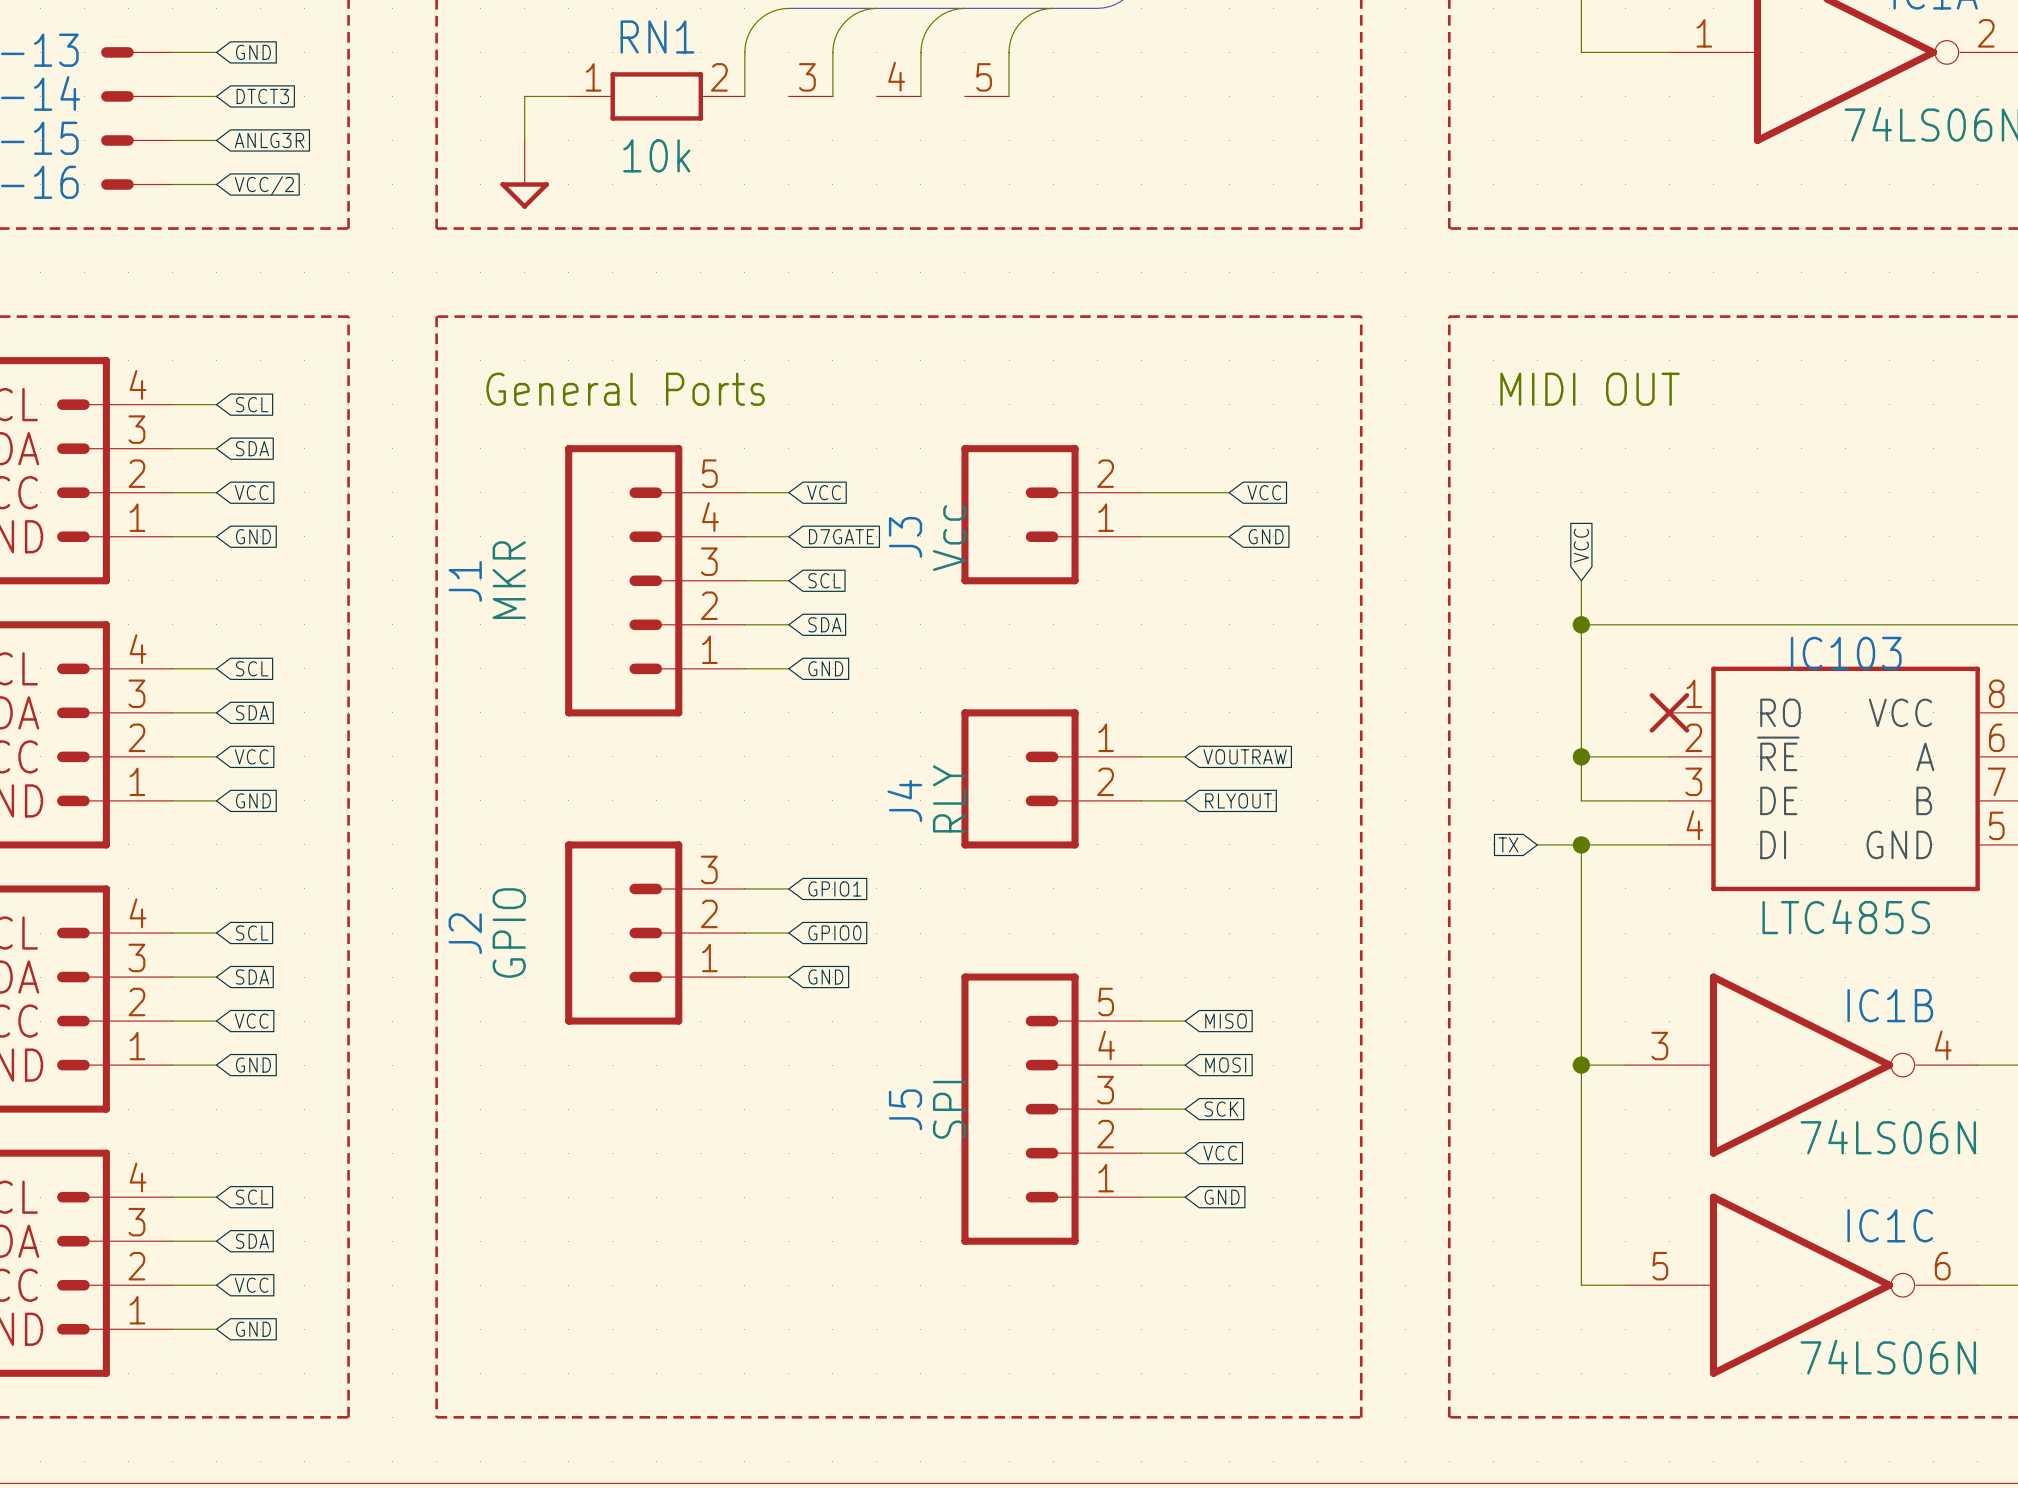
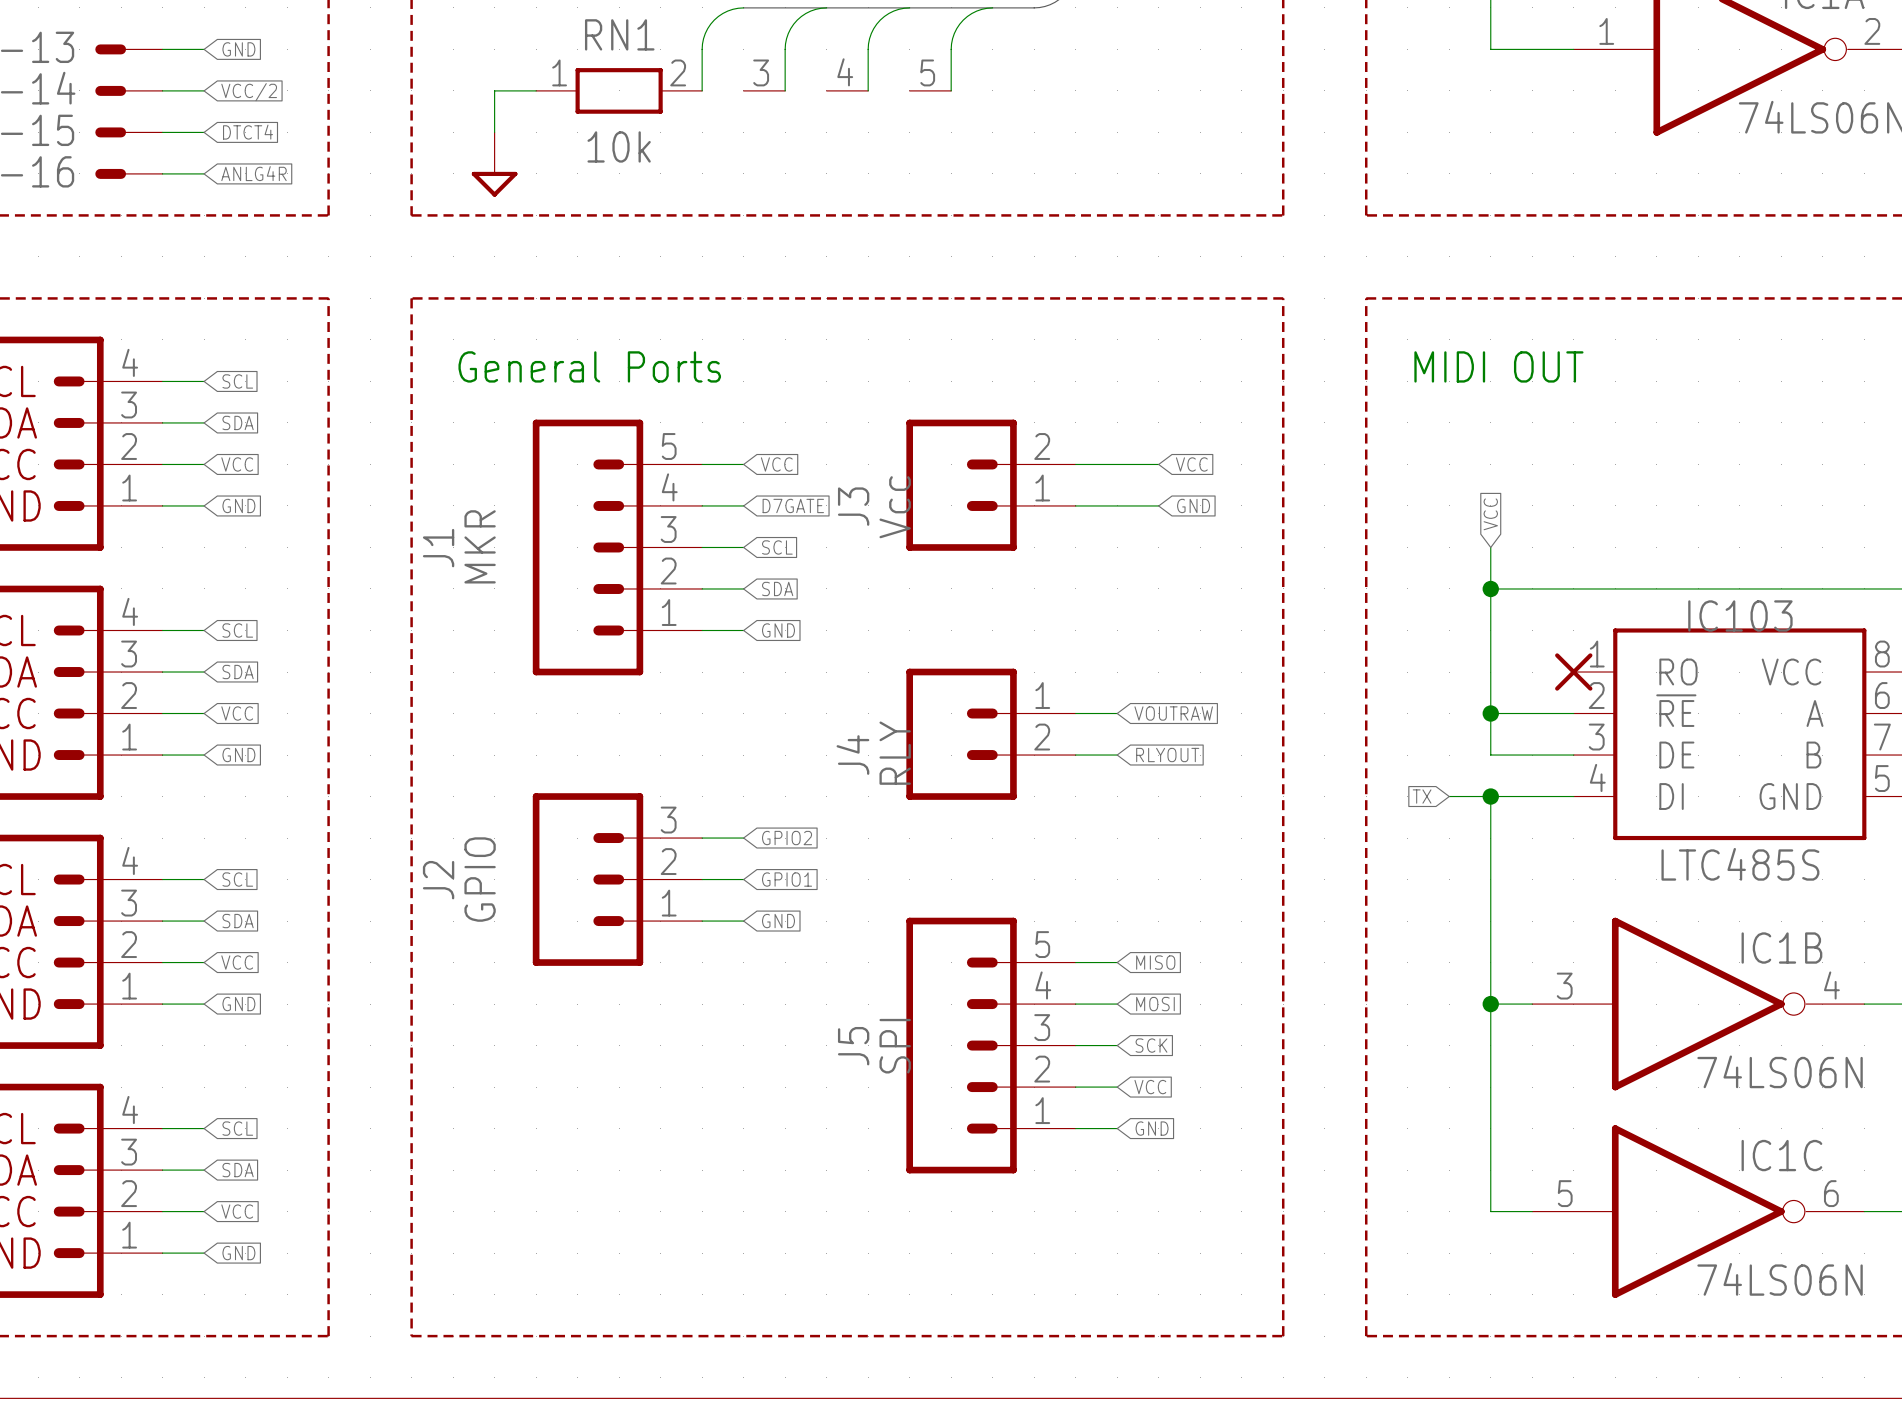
global label: DTCT3 (262, 96) -> VCC/2 (249, 92)
global label: ANLG3R (269, 140) -> DTCT4 (248, 132)
global label: VCC/2 (264, 185) -> ANLG4R (254, 173)
global label: GPIO1 (834, 888) -> GPIO2 (787, 838)
global label: GPIO0 (834, 933) -> GPIO1 (787, 879)

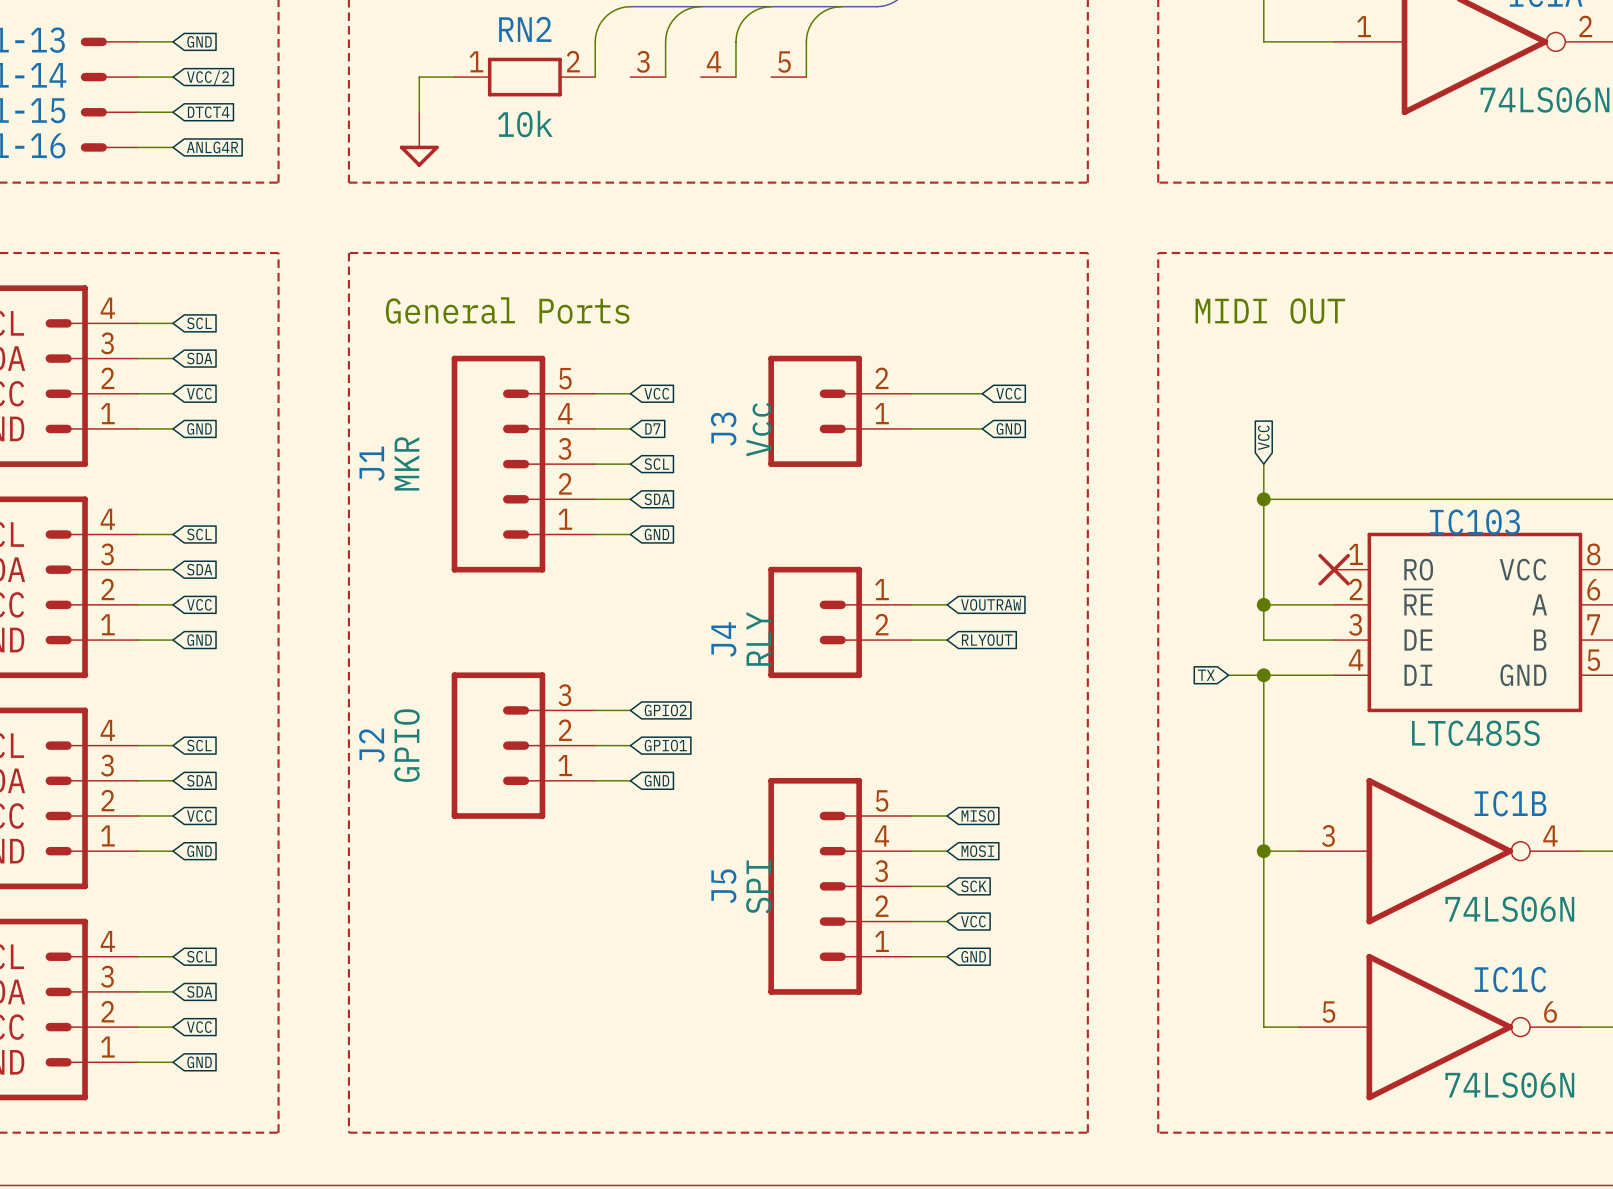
RN1 name: RN1 (619, 34) -> RN2 (525, 29)
global label: D7GATE (793, 505) -> D7 (652, 428)

